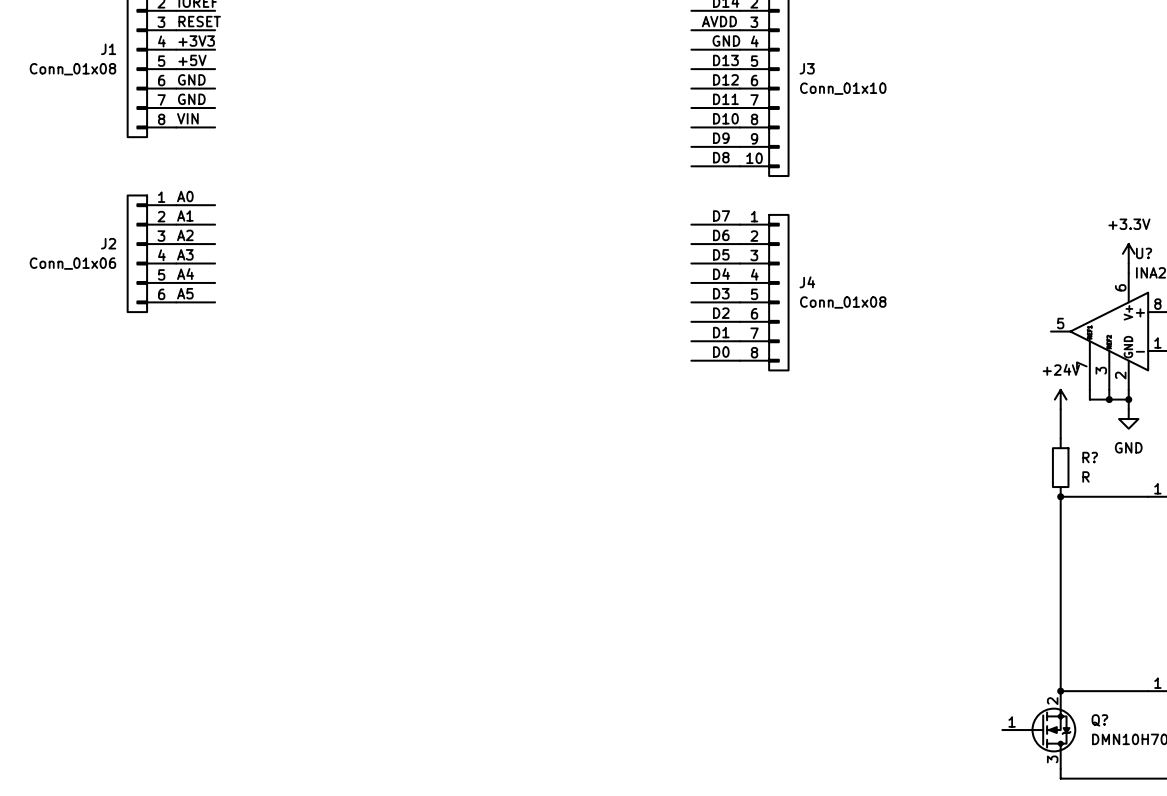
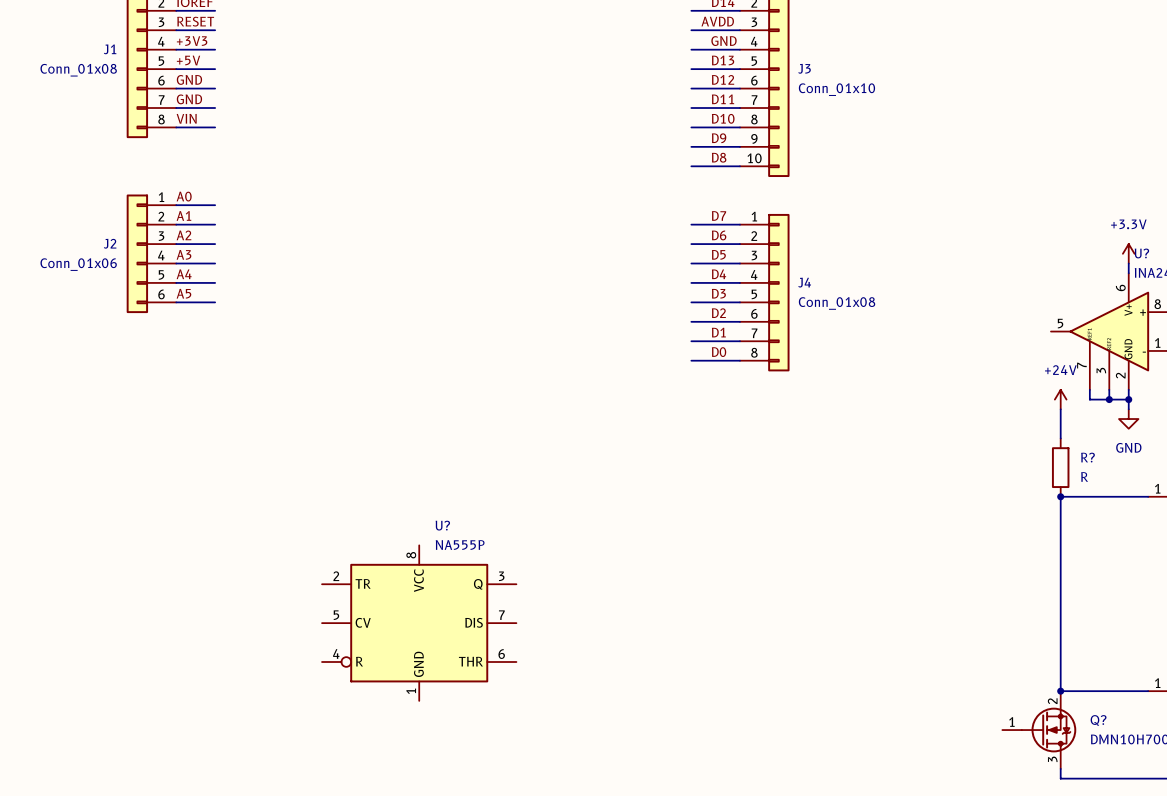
U?: none -> NA555P (419, 623)

